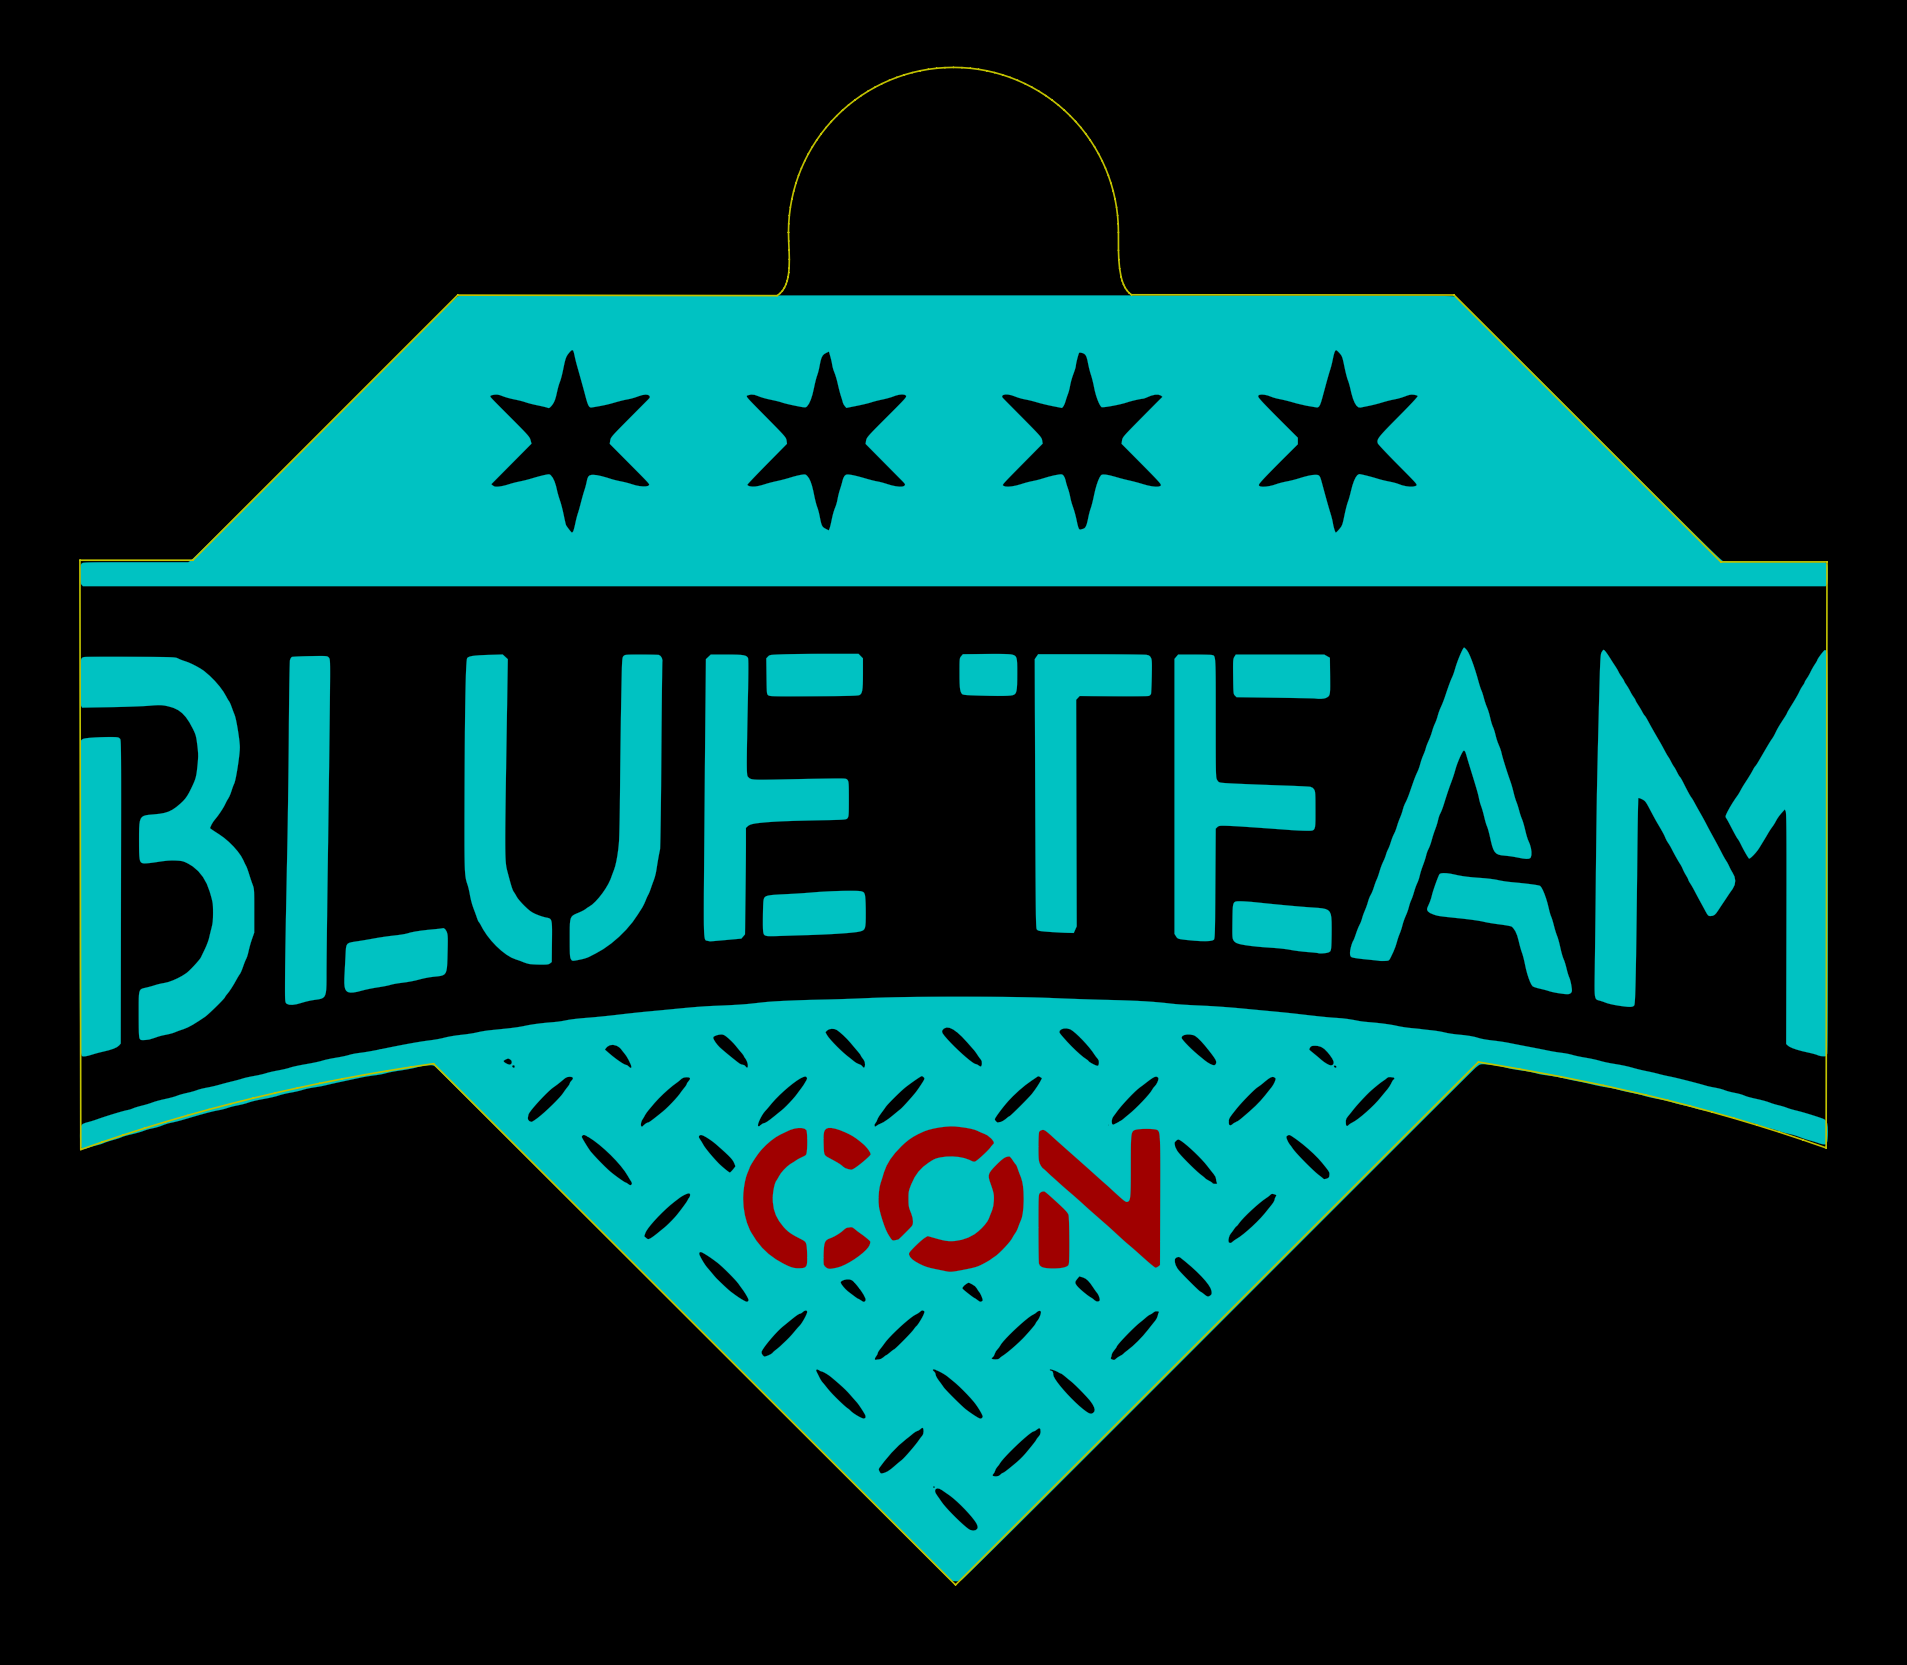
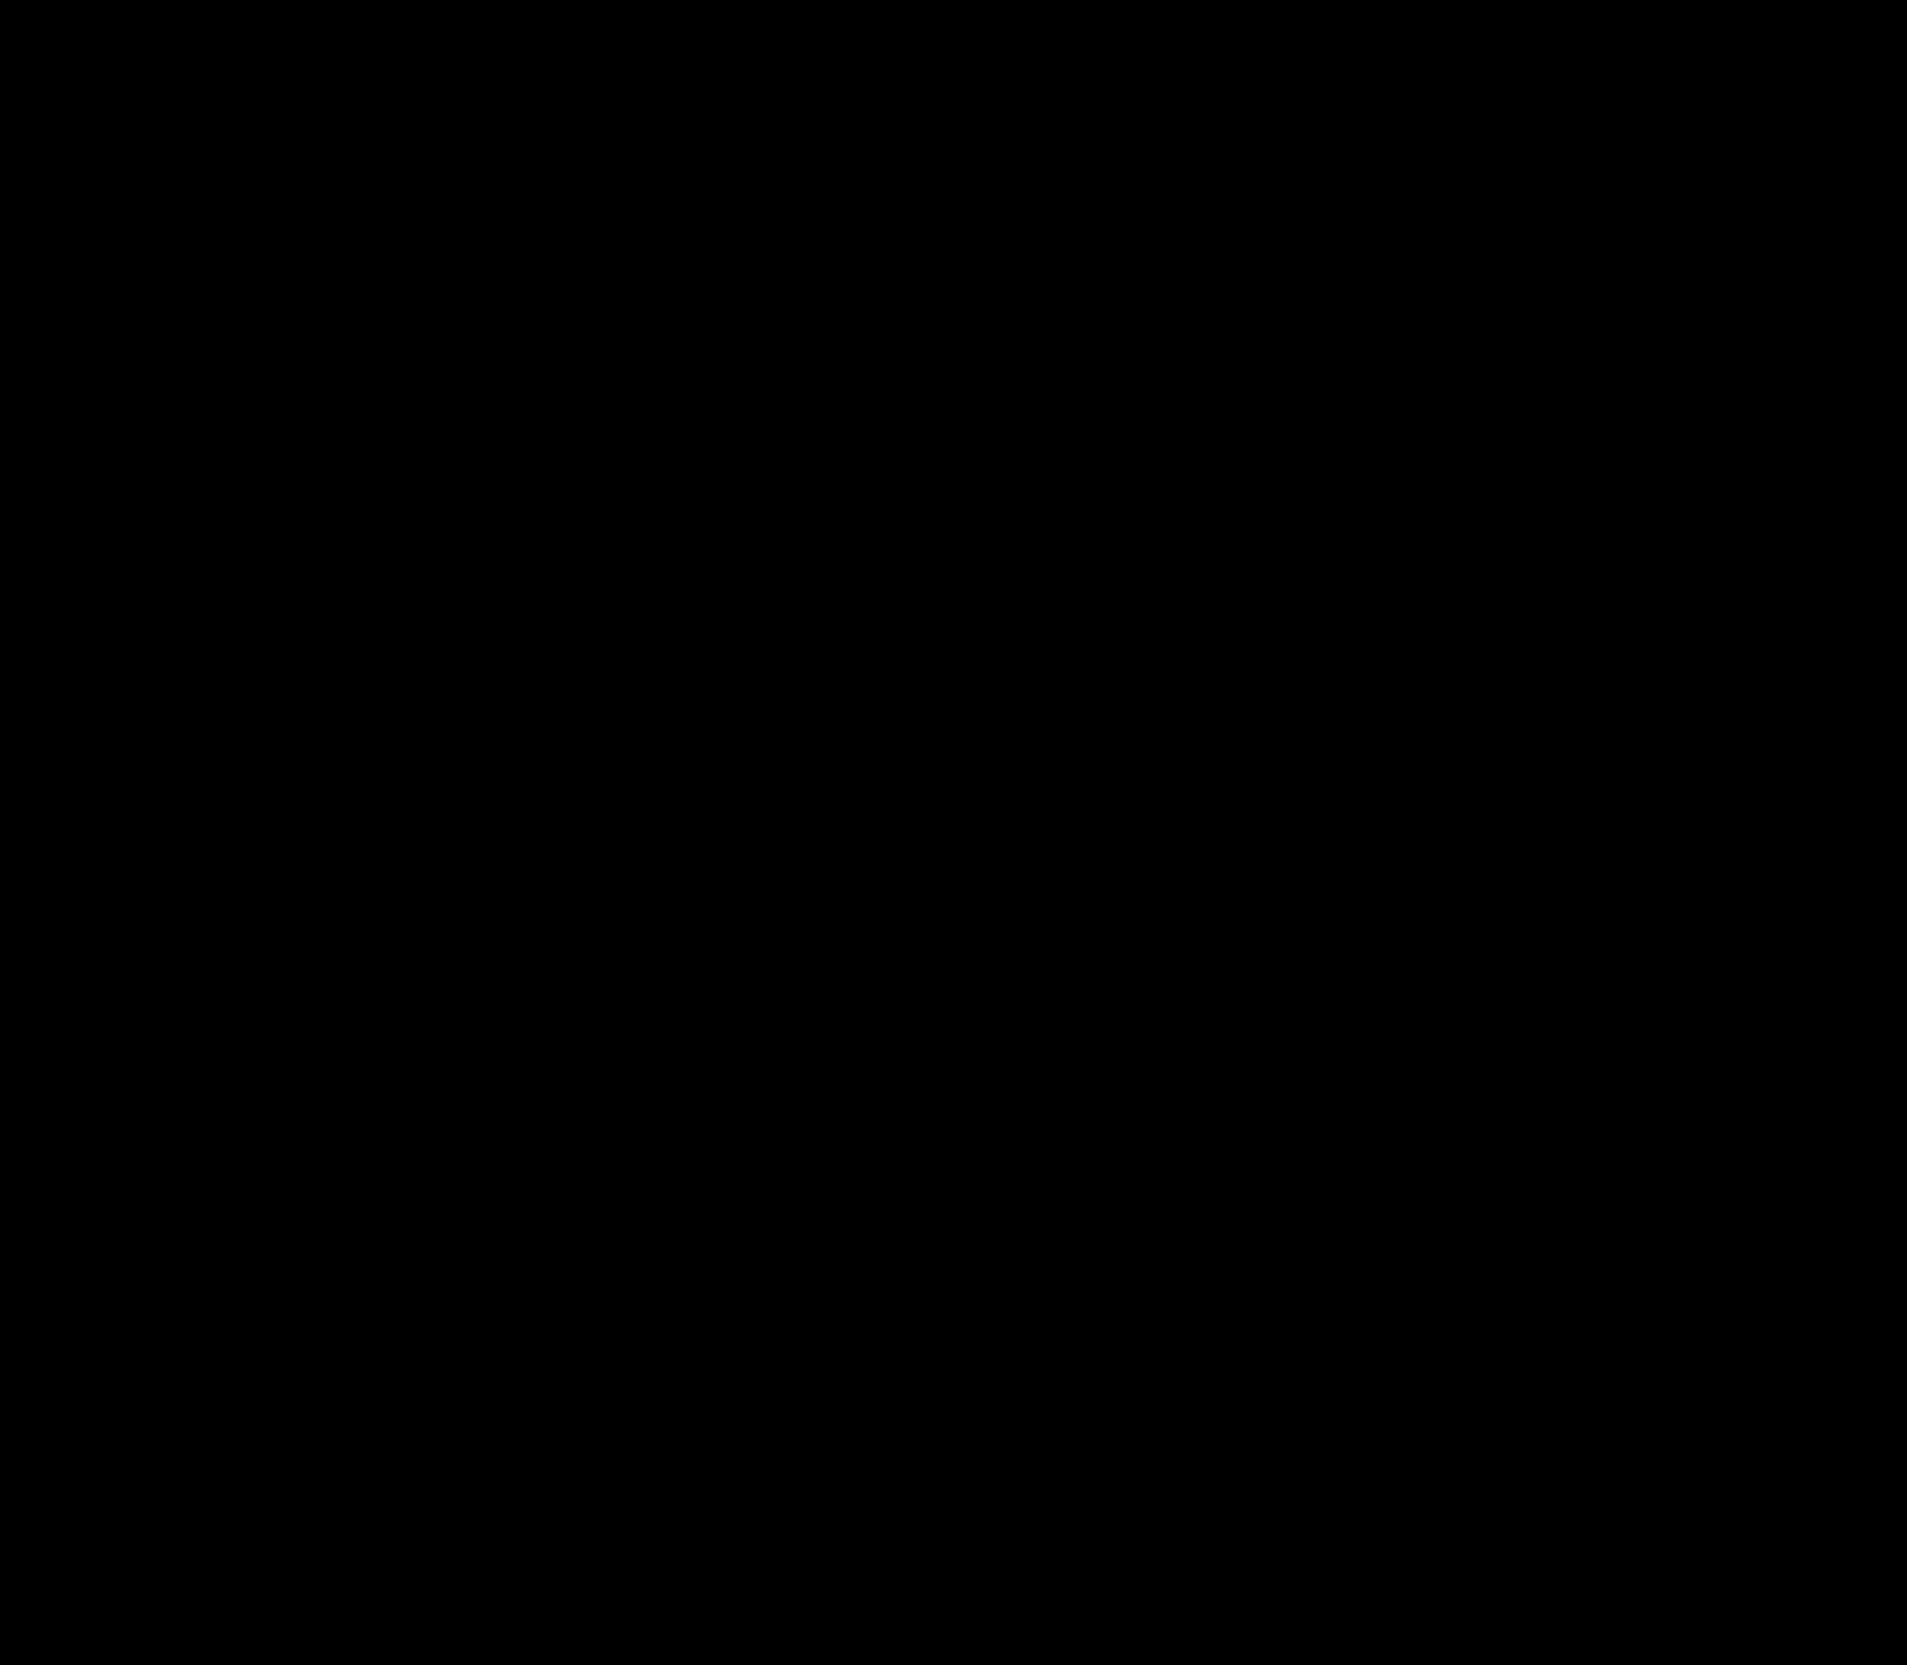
board edge: (953, 67) (920, 70) (881, 83) (848, 105) (821, 133) (804, 160) (793, 191) (788, 223) (788, 276) (784, 287) (777, 295) (457, 295) (192, 560) (79, 560) (80, 1149) (165, 1121) (252, 1098) (342, 1078) (433, 1063) (955, 1584) (1478, 1062) (1561, 1076) (1667, 1100) (1756, 1125) (1826, 1147) (1826, 561) (1720, 561) (1453, 294) (1131, 294) (1125, 287) (1121, 276) (1117, 215) (1111, 183) (1102, 160) (1085, 133) (1058, 105) (1024, 83) (986, 70) (953, 67) -> none
drawing: [79, 295, 1828, 1582] -> none

